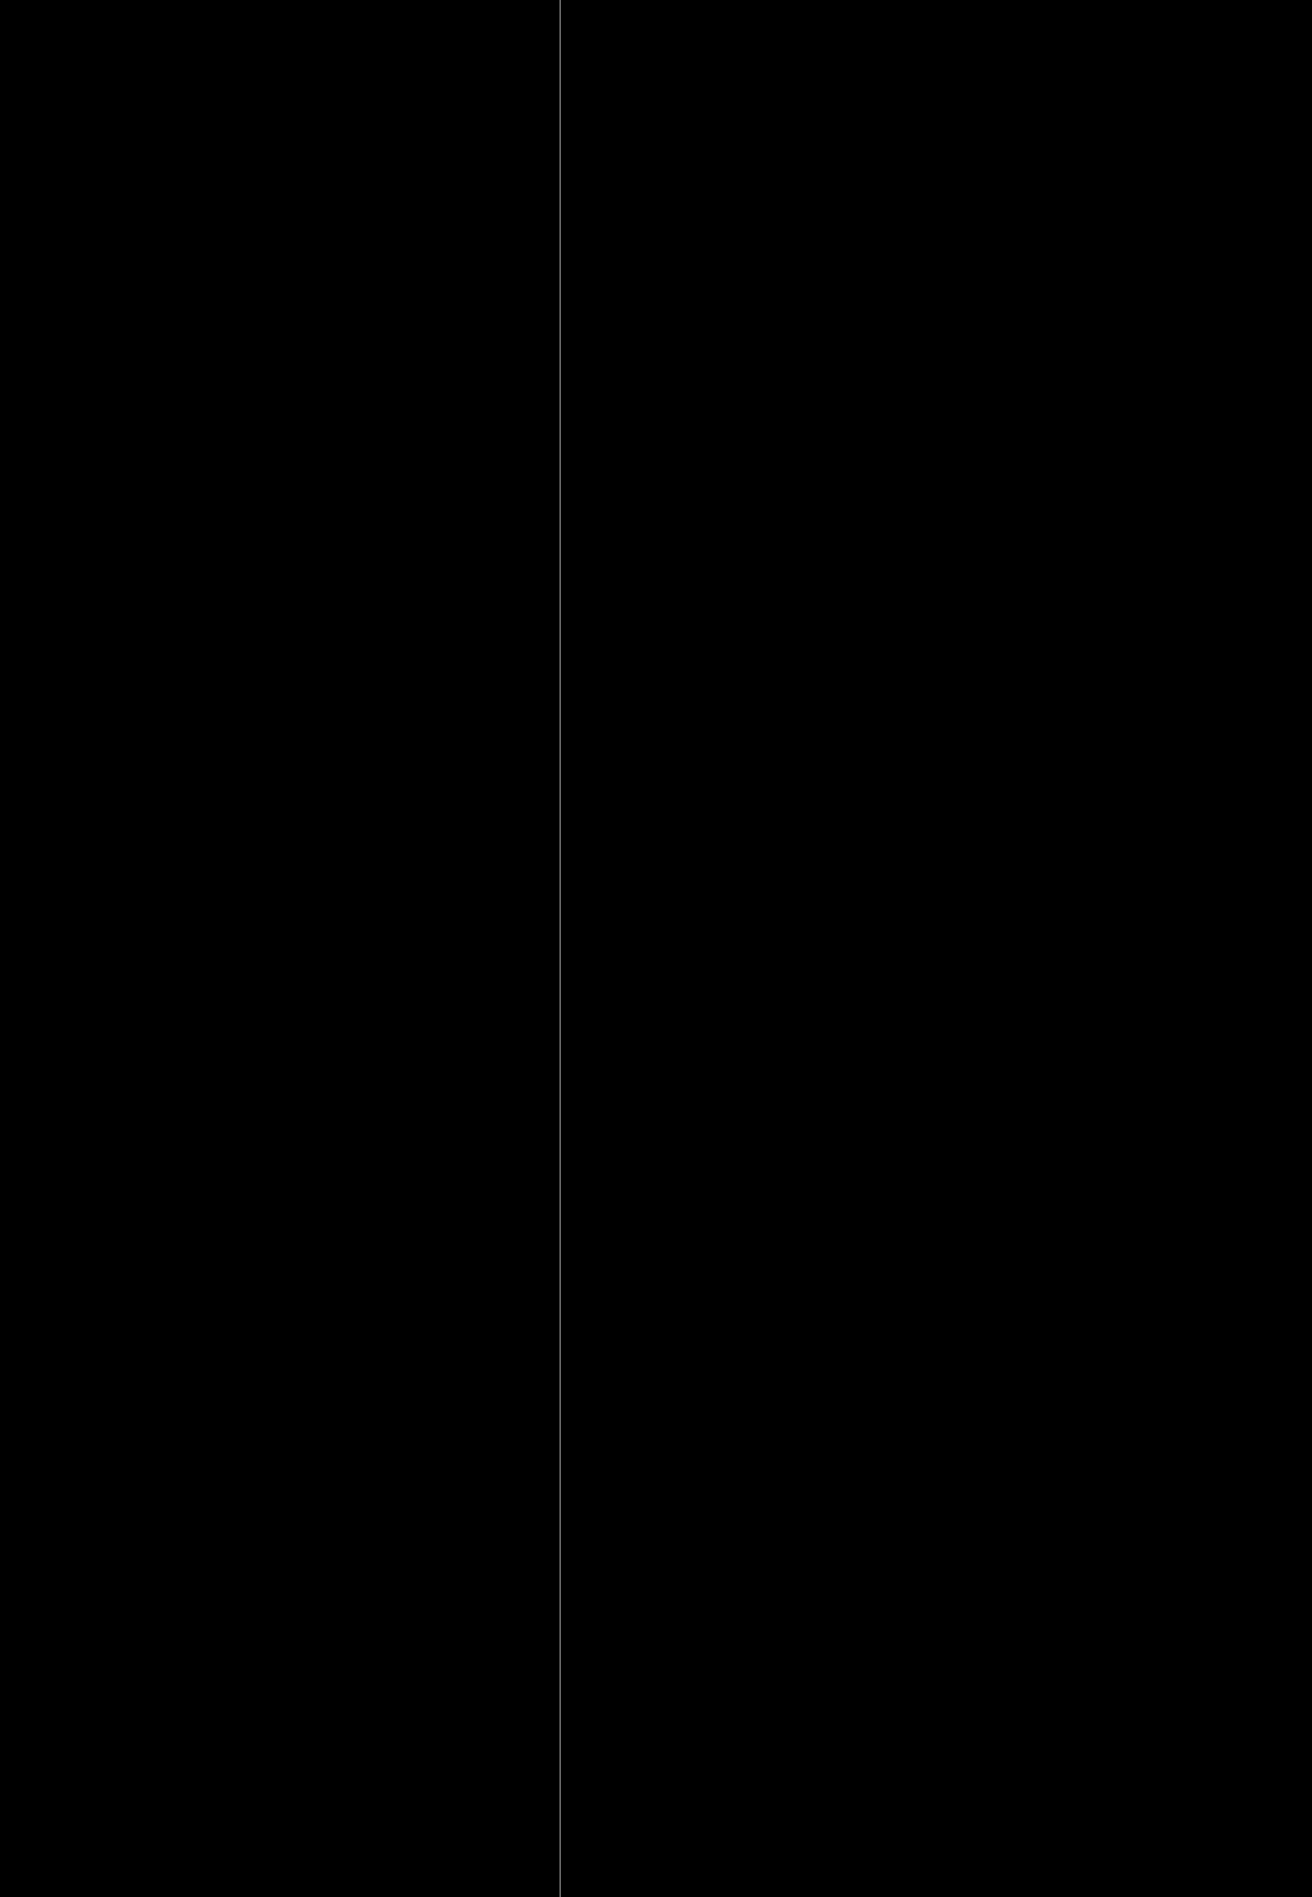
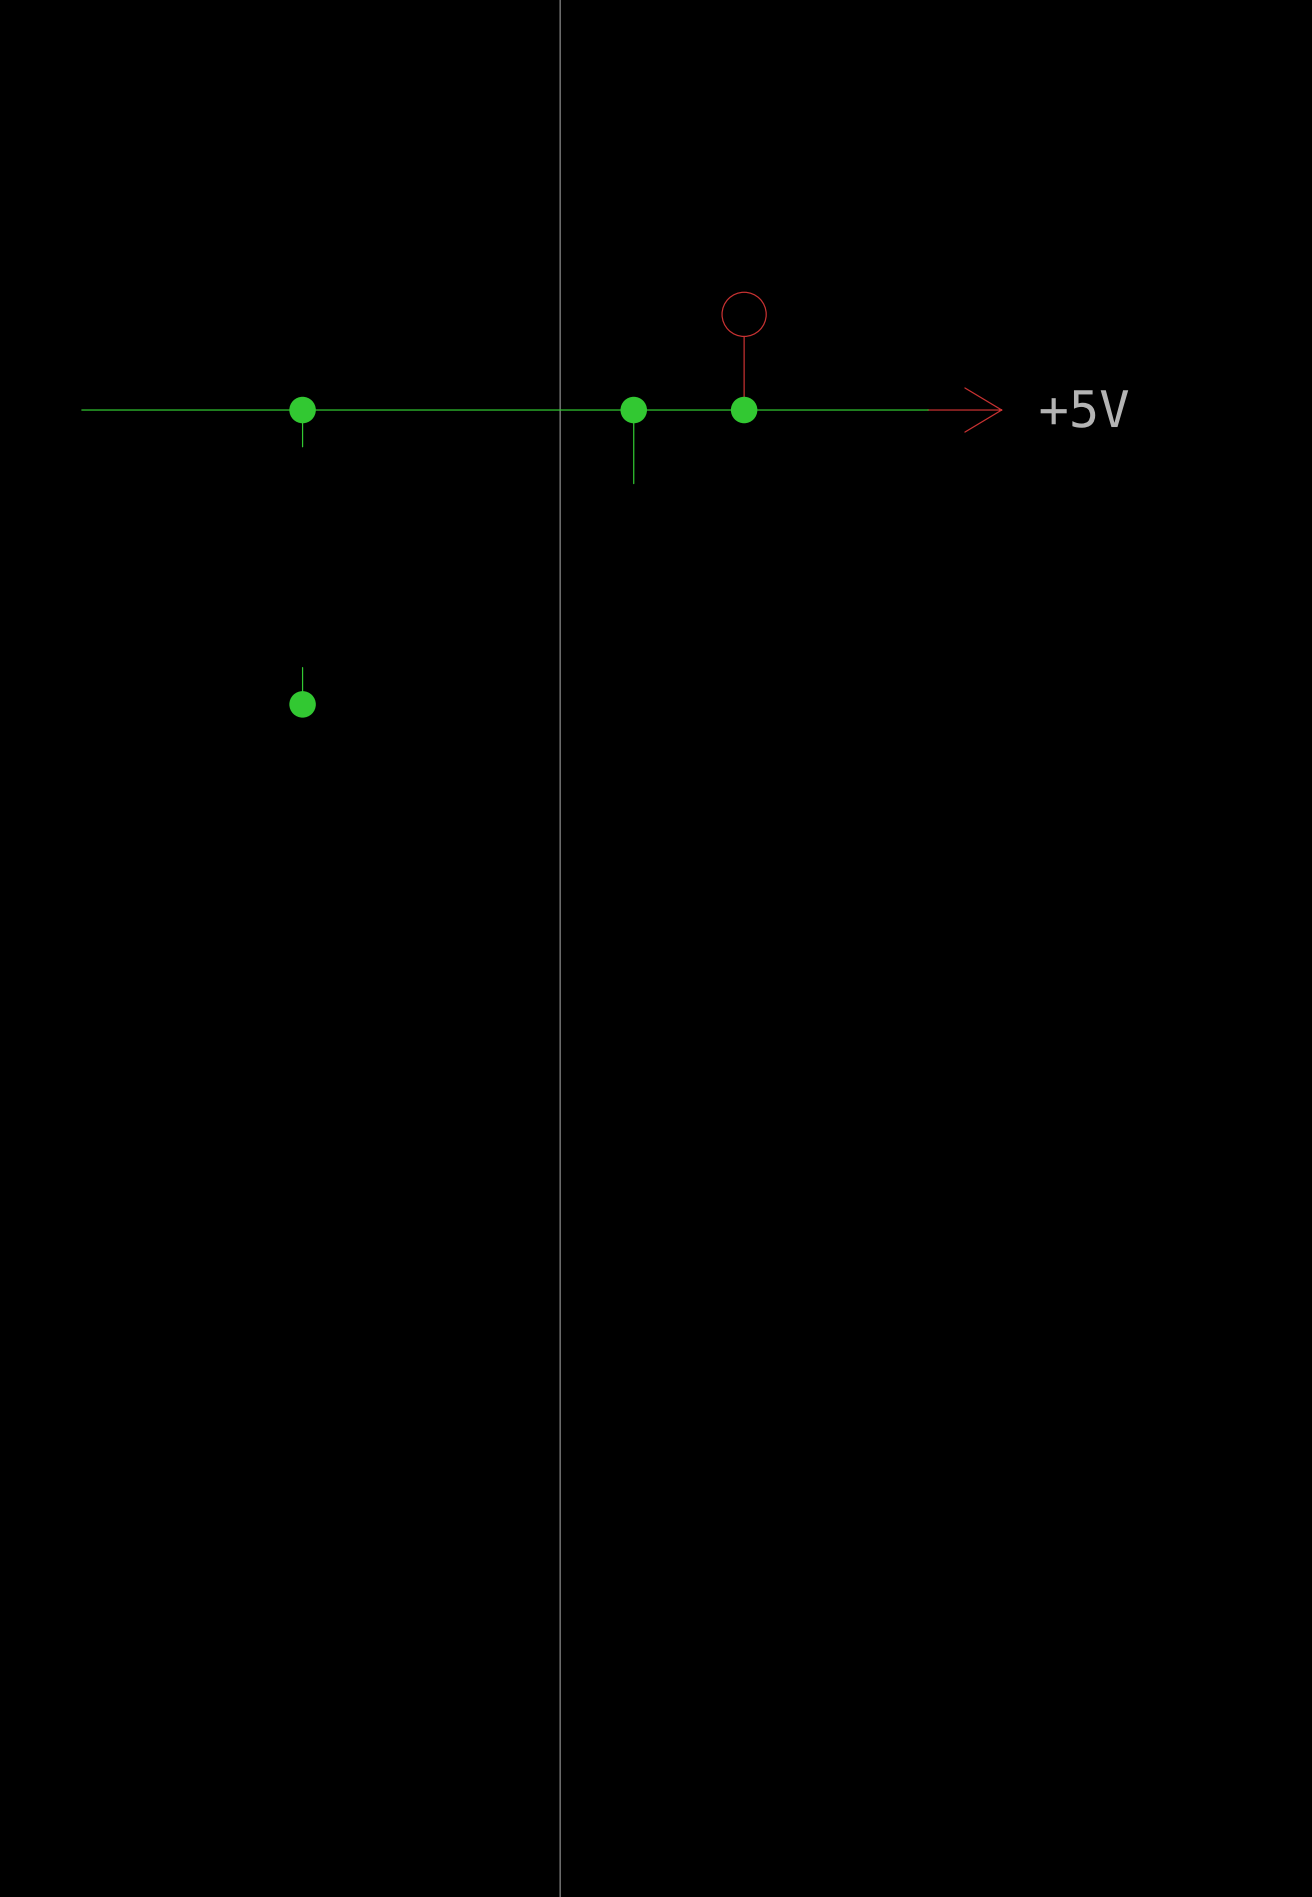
part: none -> (744, 351)
wire: none -> (81, 410) (928, 410)
wire: none -> (302, 410) (302, 446)
junction: none -> (302, 410)
wire: none -> (633, 410) (633, 483)
junction: none -> (633, 410)
junction: none -> (744, 410)
power symbol: none -> +5V (964, 410)
wire: none -> (302, 667) (302, 704)
junction: none -> (302, 704)

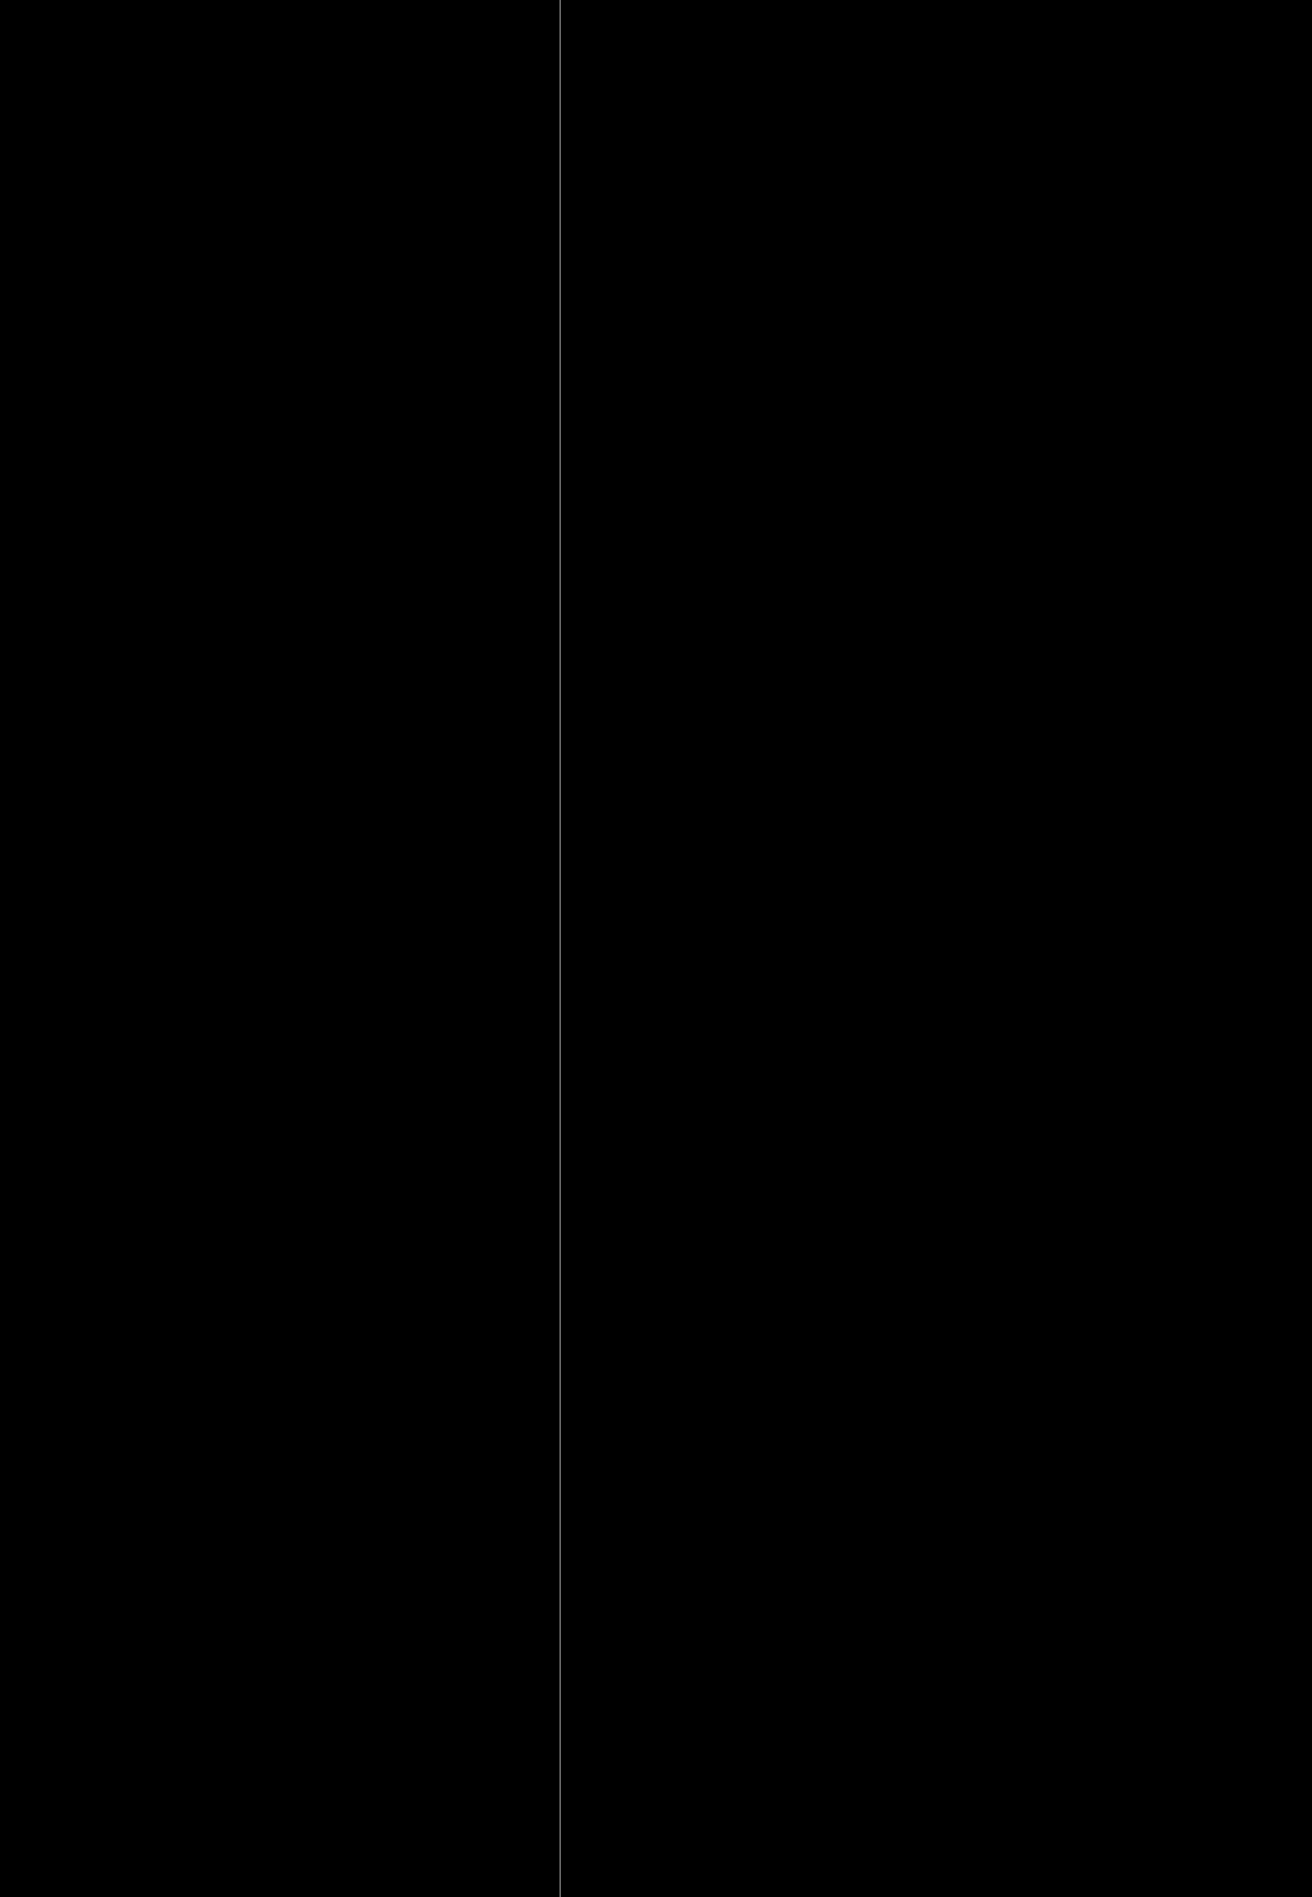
part: (744, 351) -> none
wire: (81, 410) (928, 410) -> none
wire: (302, 410) (302, 446) -> none
junction: (302, 410) -> none
wire: (633, 410) (633, 483) -> none
junction: (633, 410) -> none
junction: (744, 410) -> none
power symbol: +5V (964, 410) -> none
wire: (302, 667) (302, 704) -> none
junction: (302, 704) -> none

